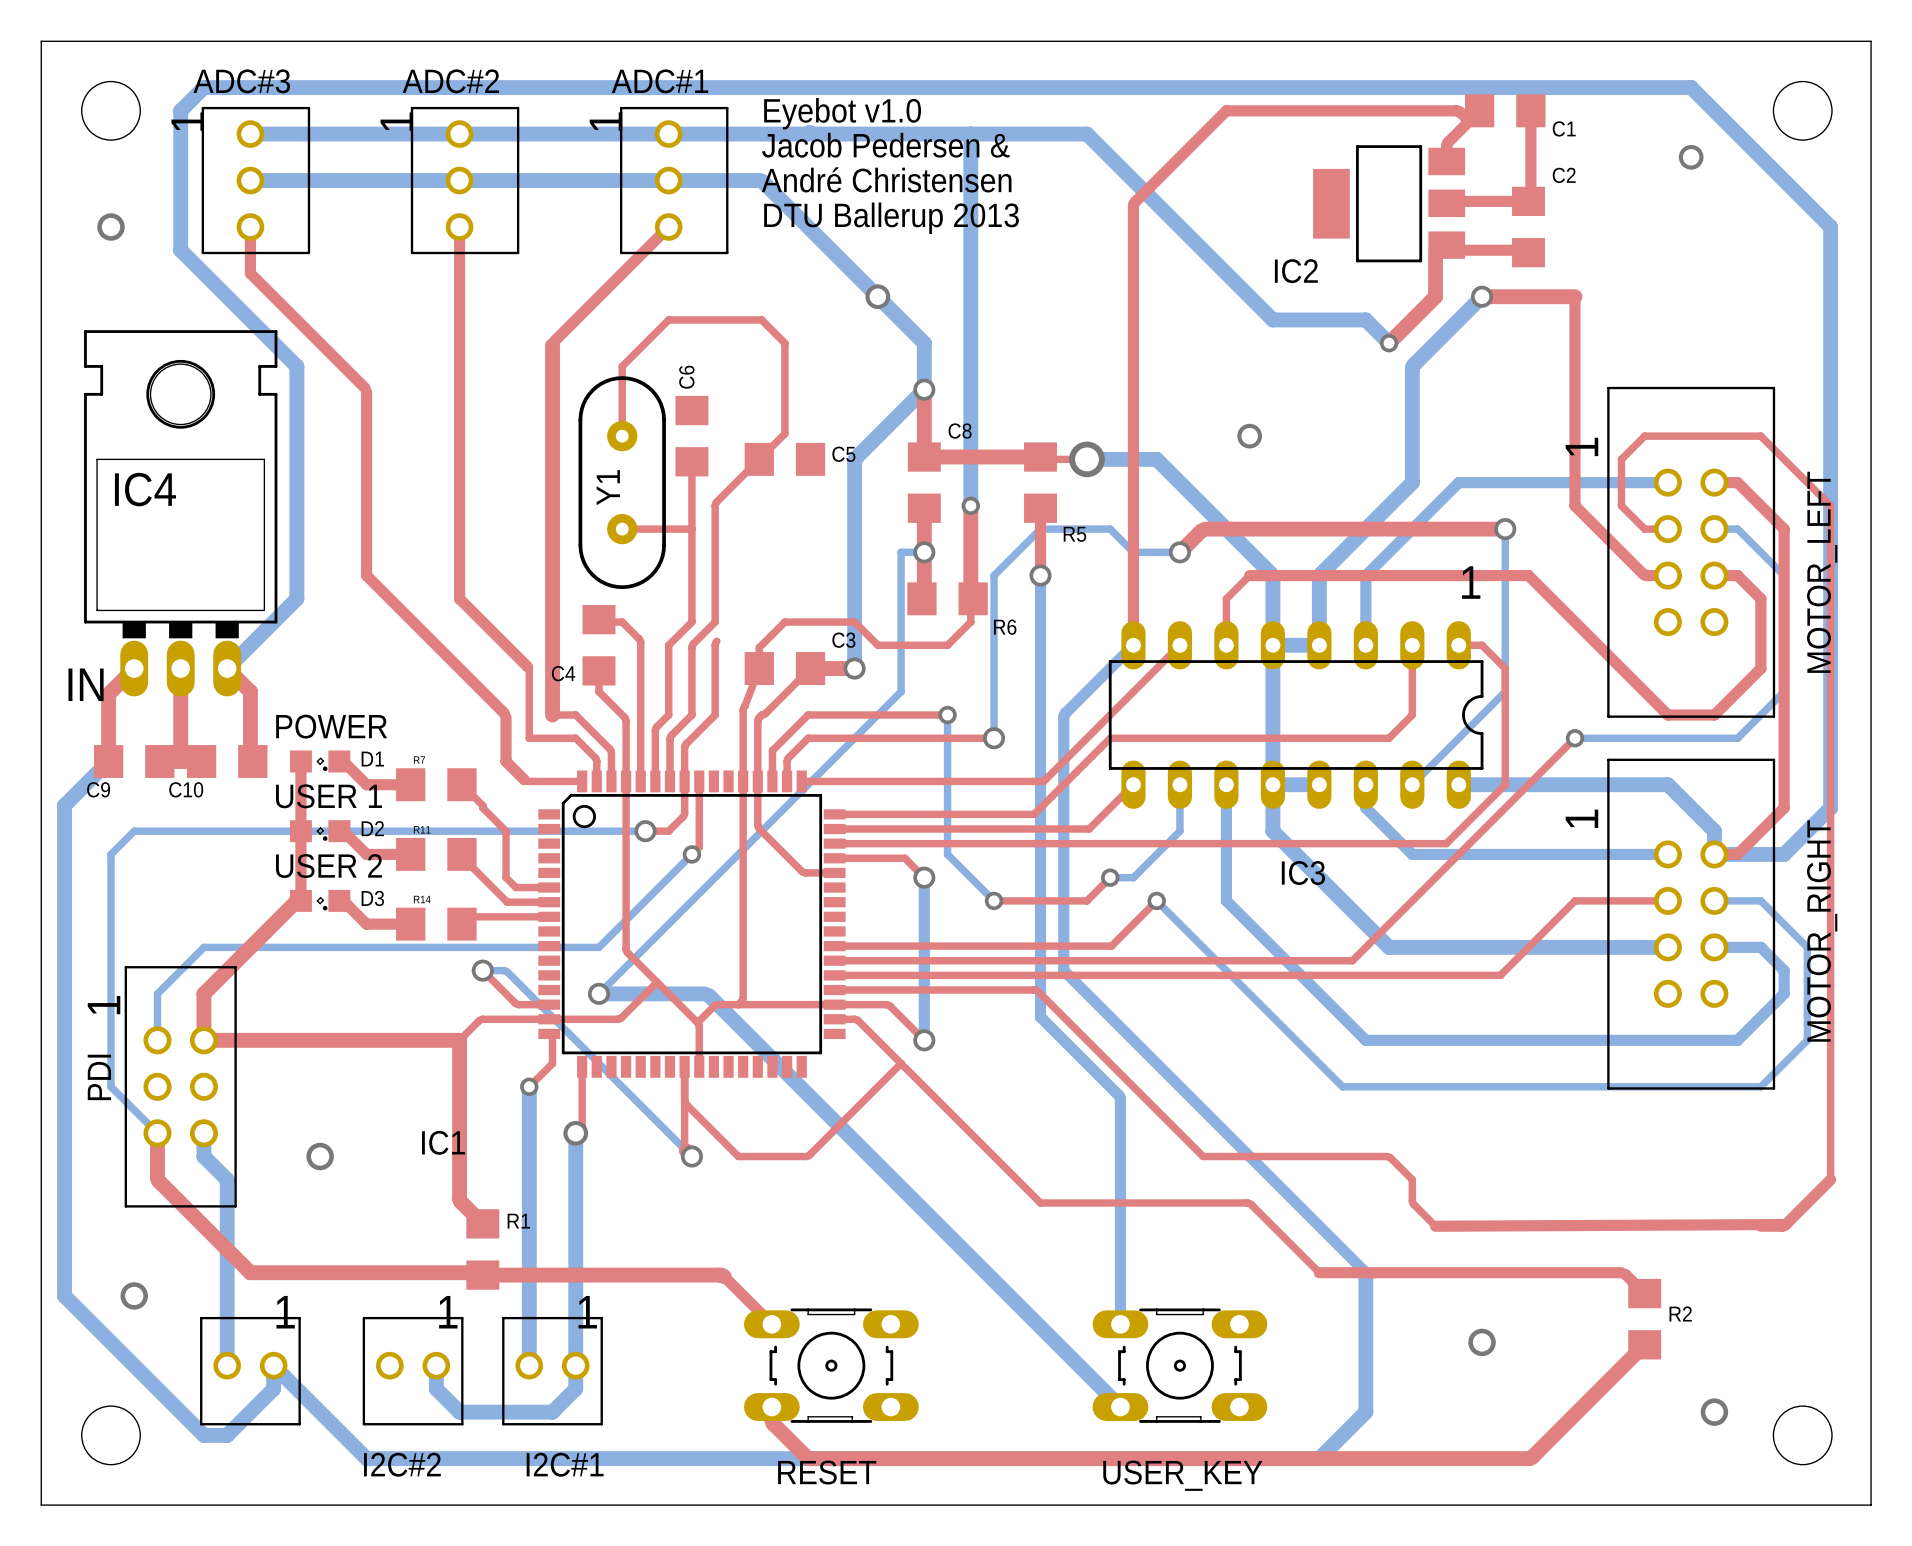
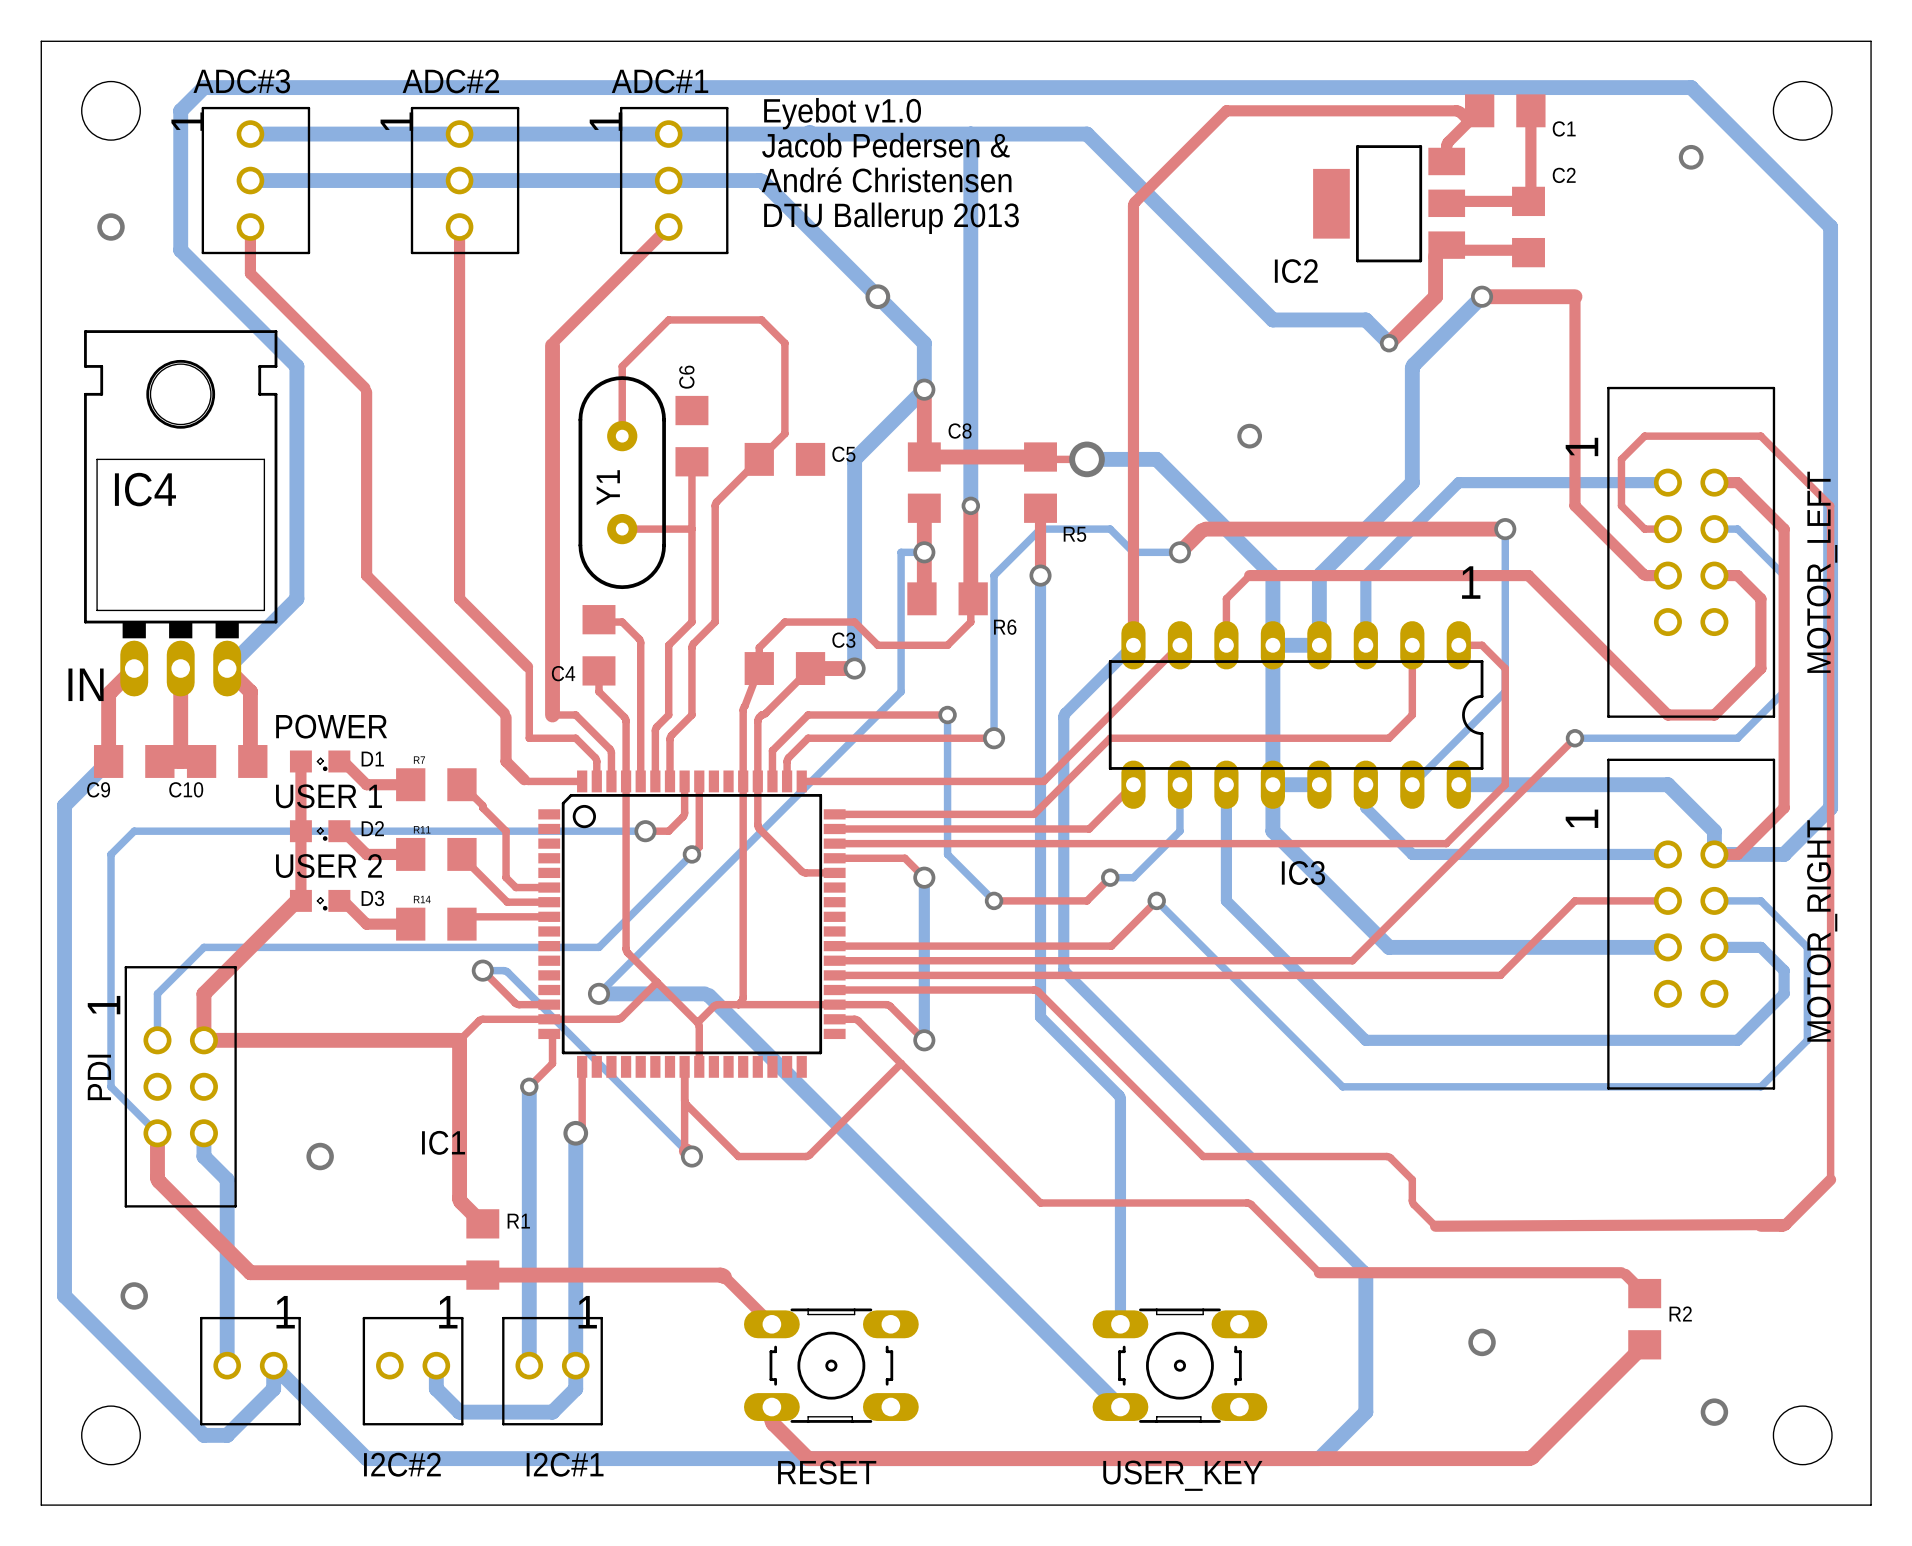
top track: (716, 641) (715, 645) (715, 715) (685, 745) (684, 781) -> none

